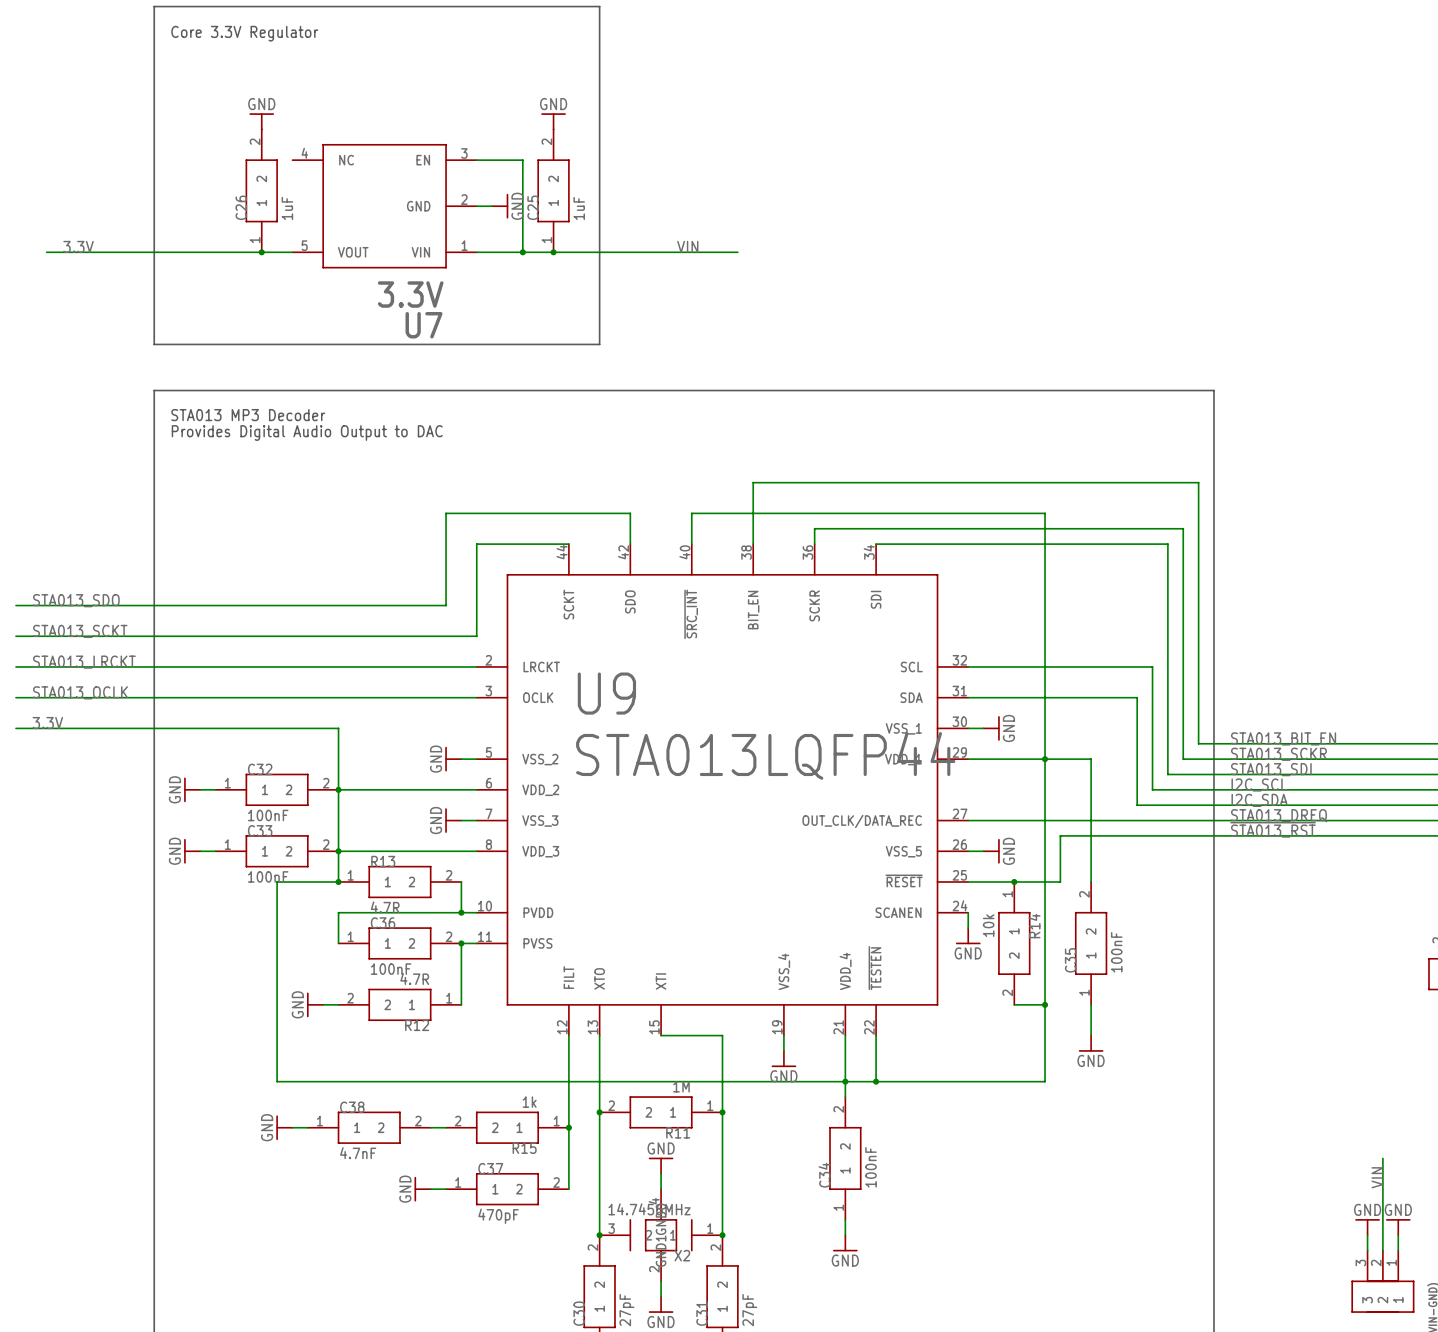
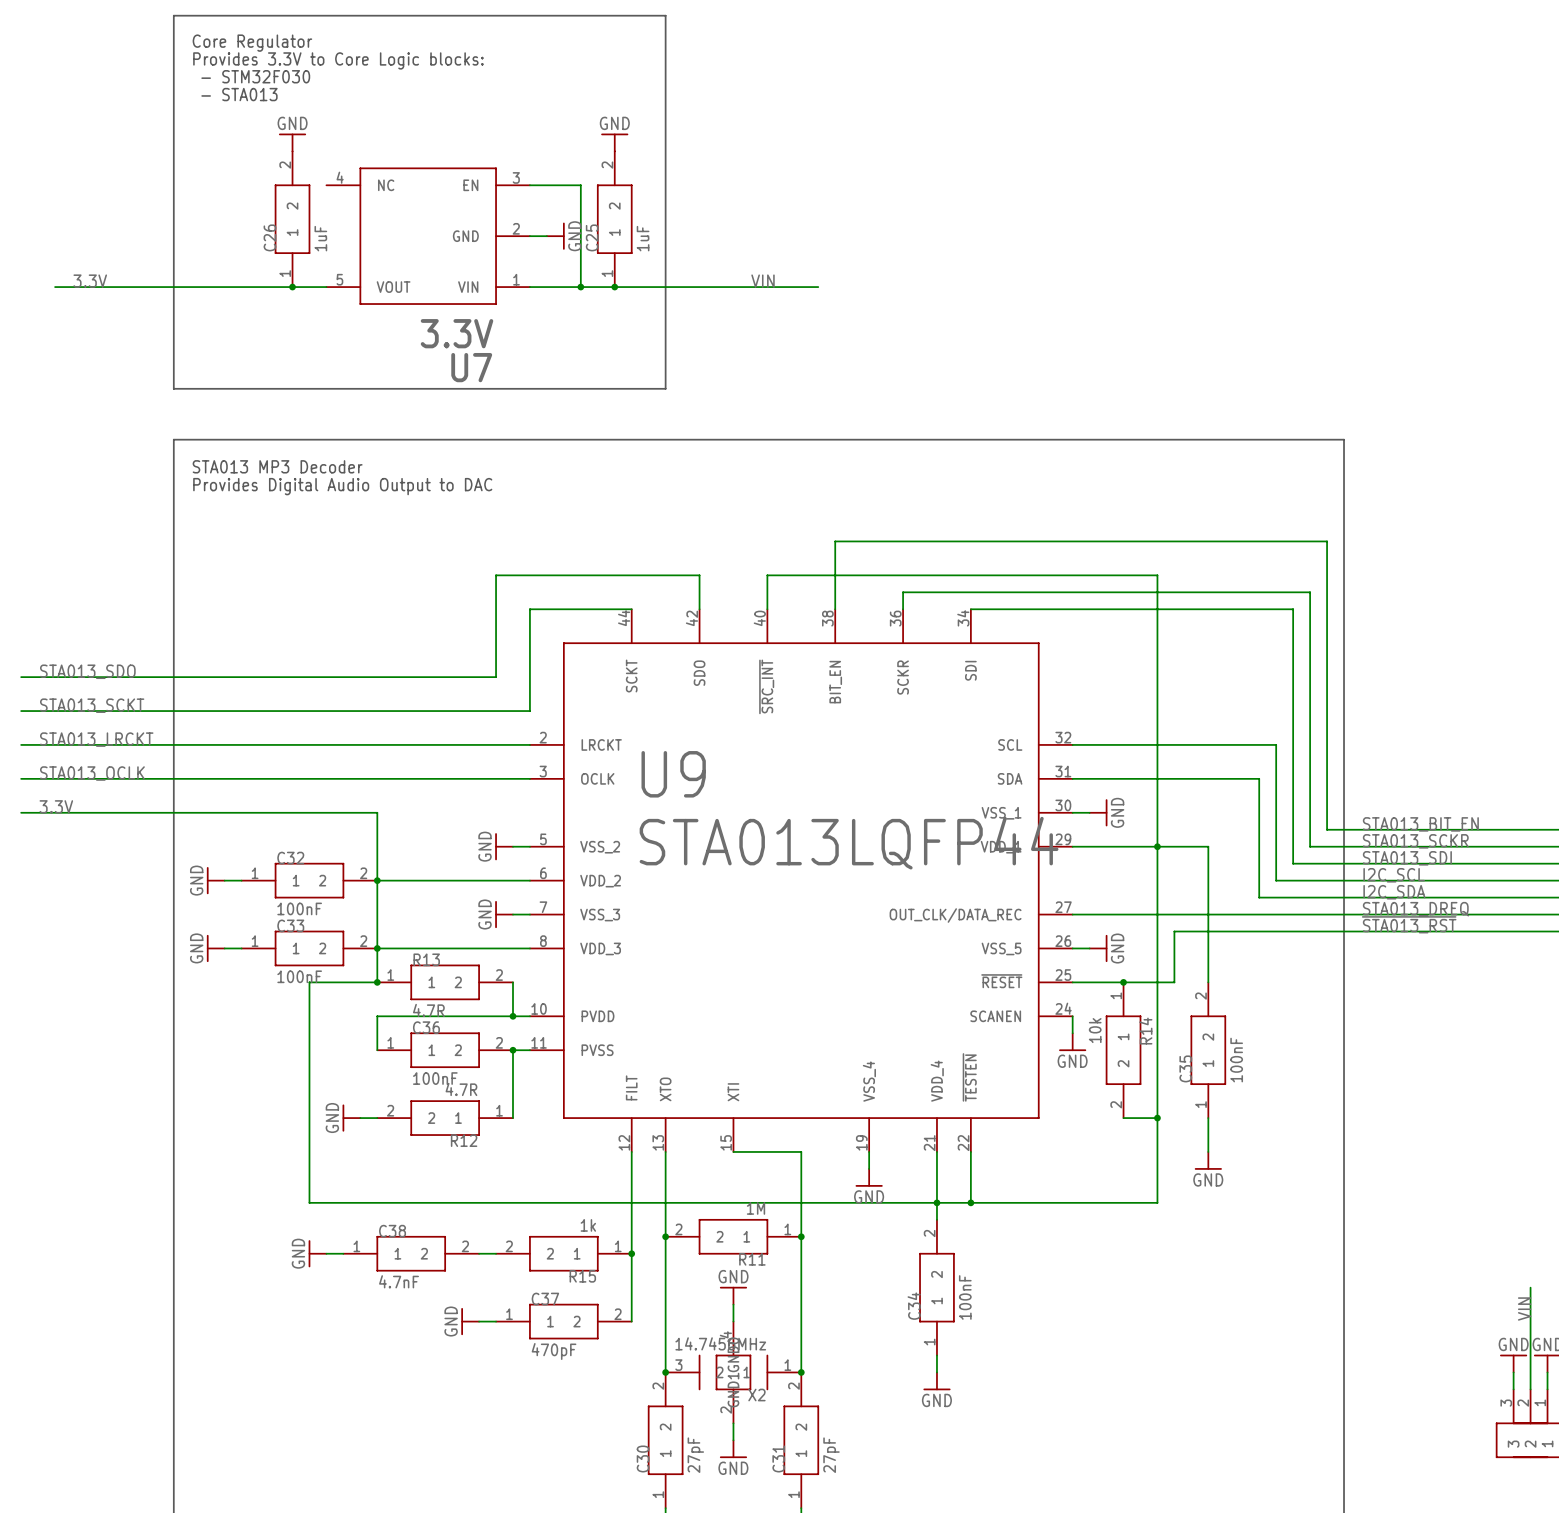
text: Core 3.3V Regulator (244, 33) -> Core Regulator (252, 43)
text: none -> Provides 3.3V to Core Logic blocks: (338, 60)
text: none -> - STM32F030 (255, 76)
text: none -> - STA013 (239, 94)

